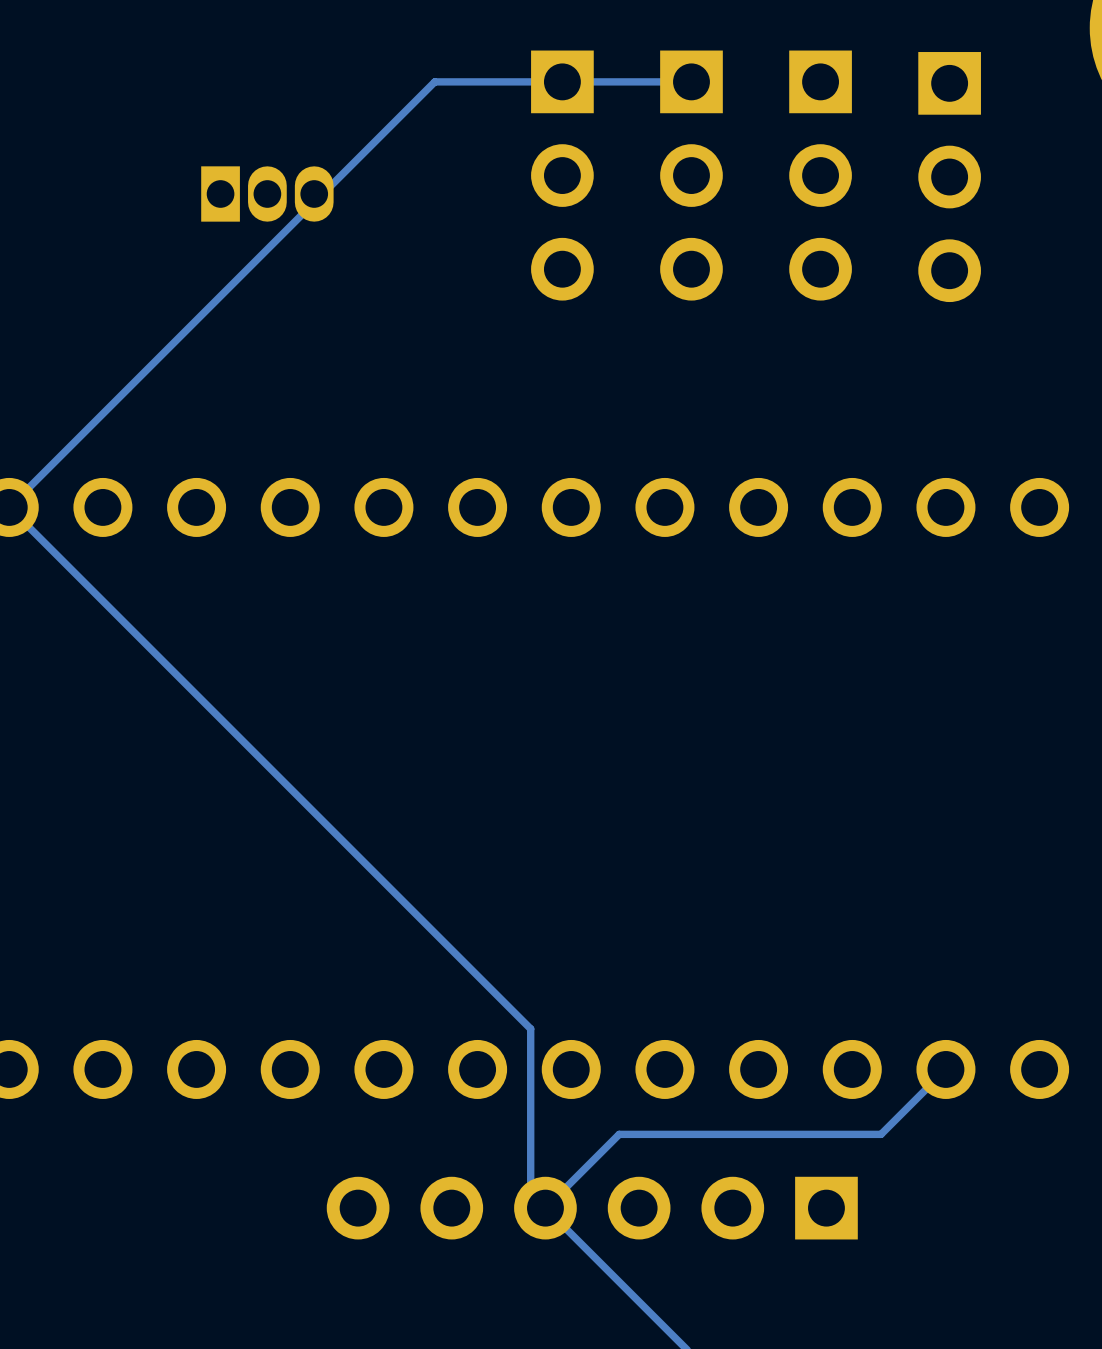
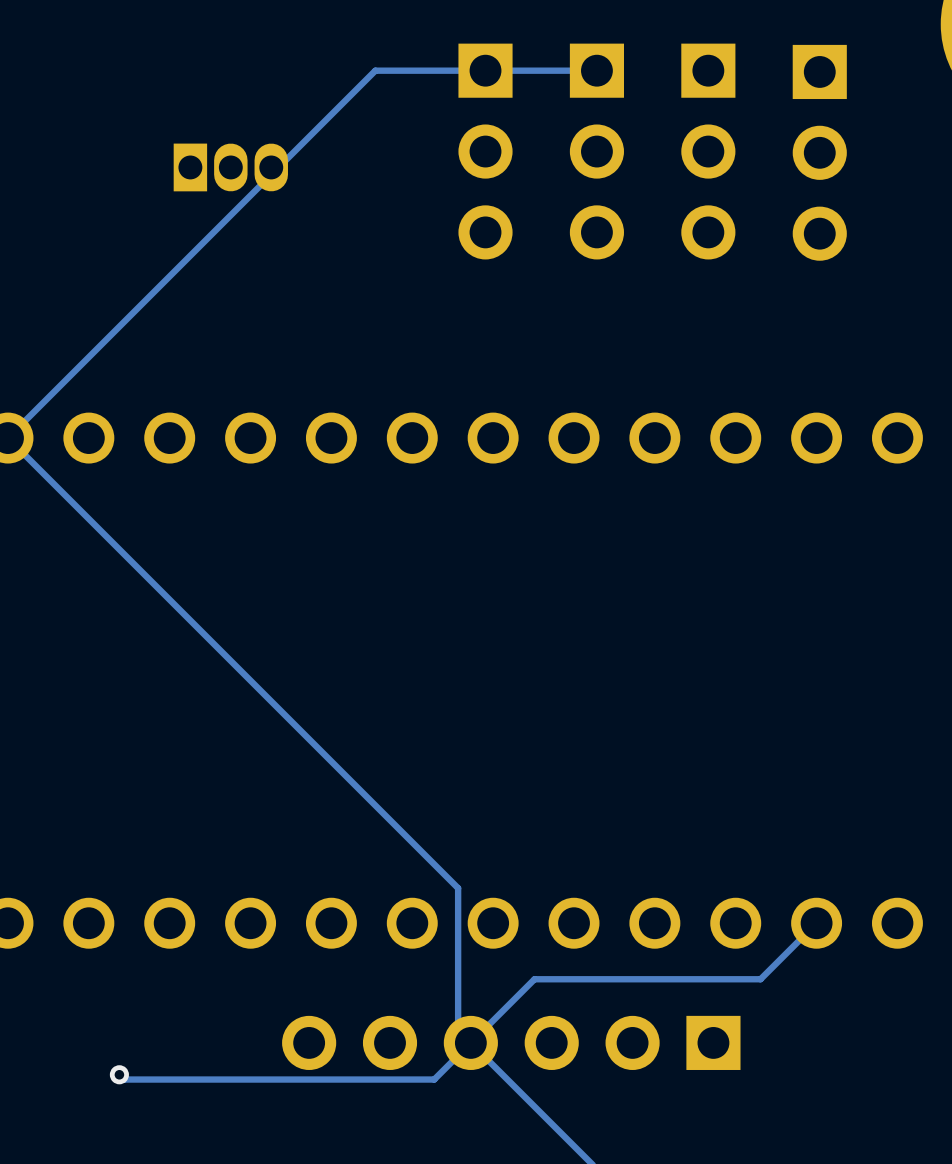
track: none -> (470, 1042) (434, 1079) (124, 1079) (119, 1074)
via: none -> (119, 1074)

